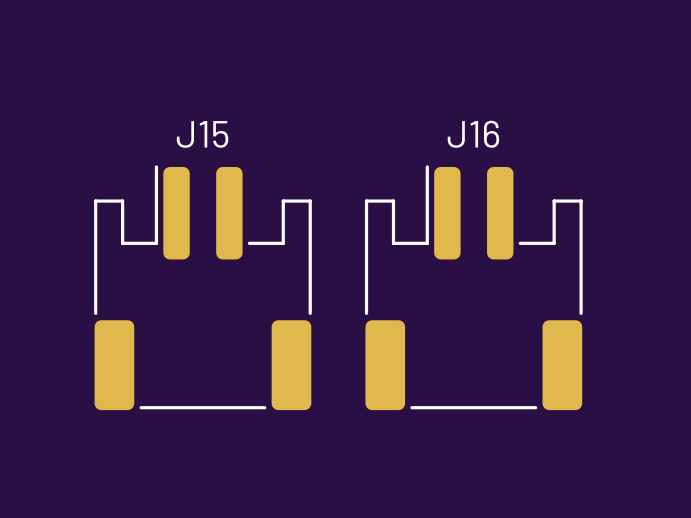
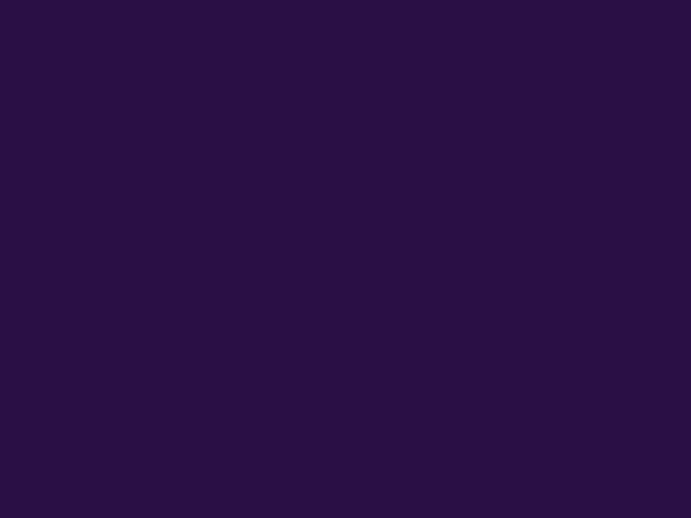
J15: (202, 287) -> none
J16: (473, 287) -> none

